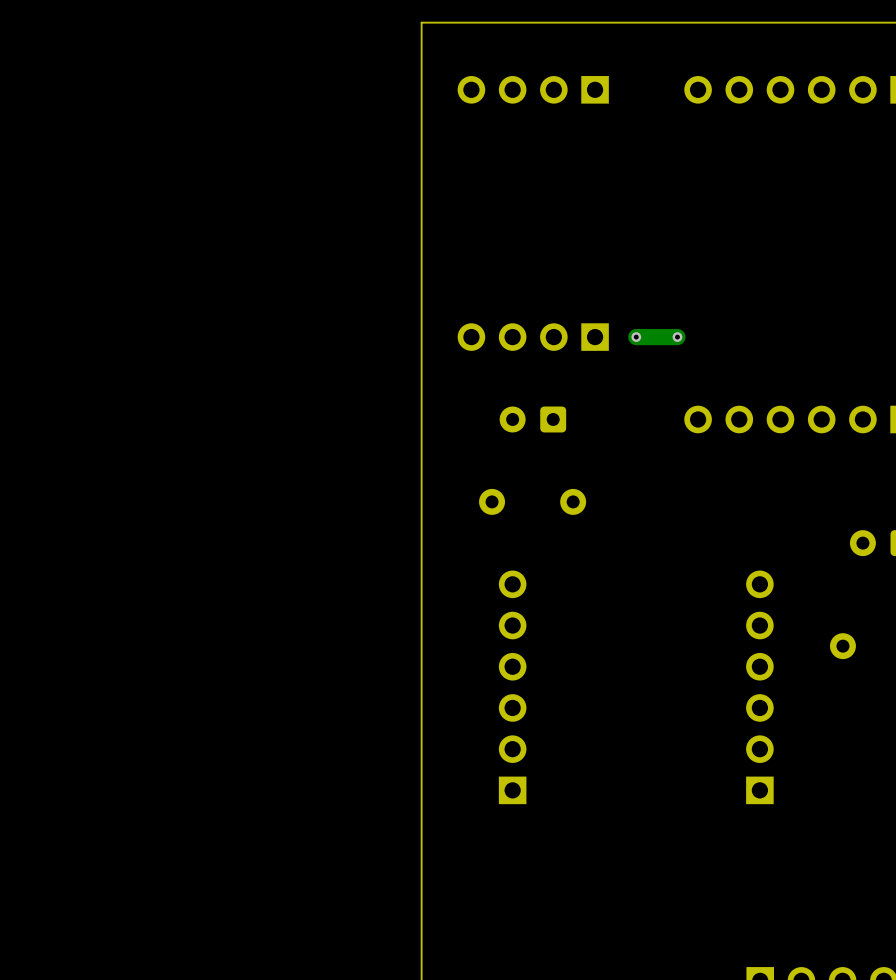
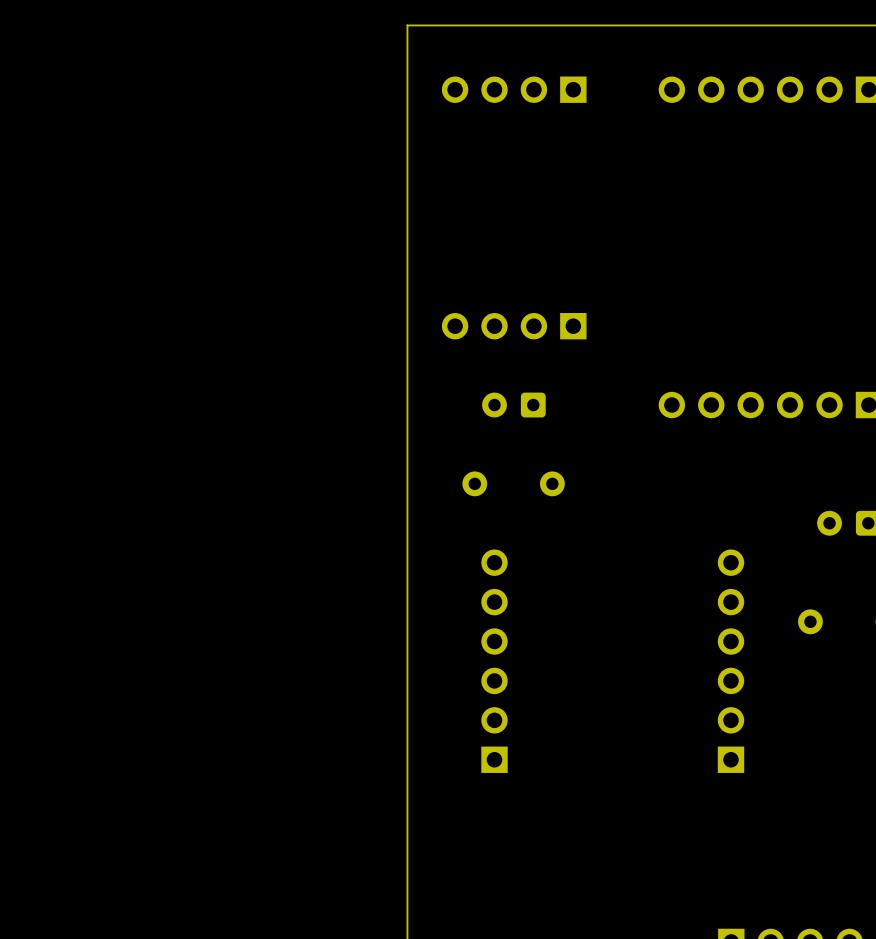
via: (636, 337) -> none
track: (677, 337) (636, 337) -> none
via: (677, 337) -> none

